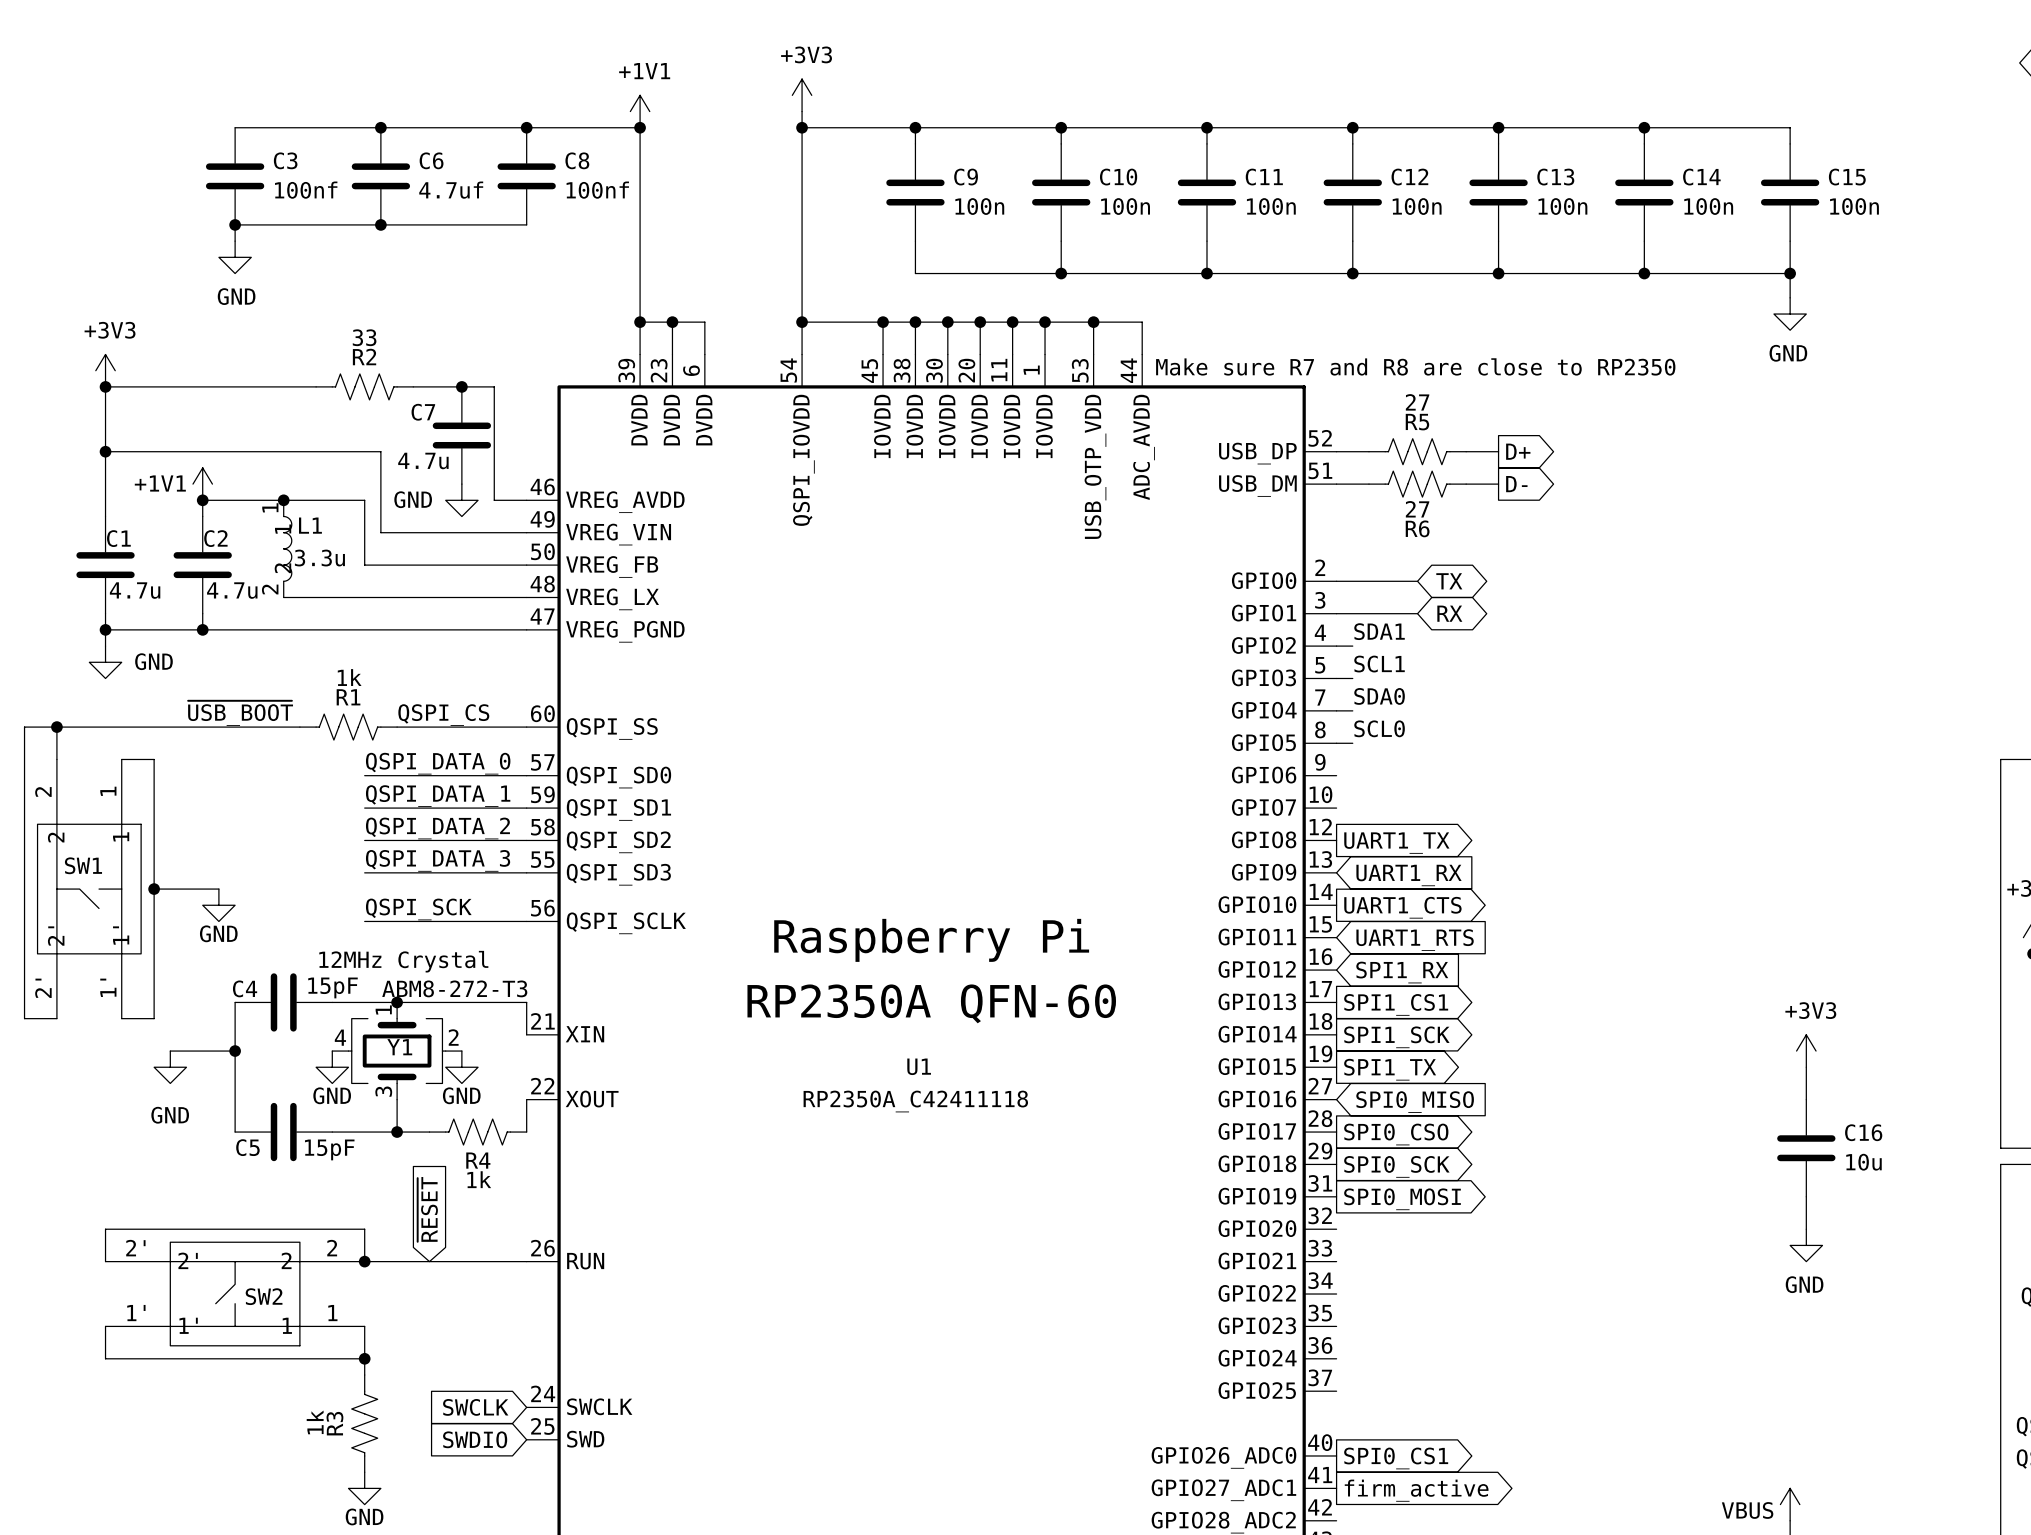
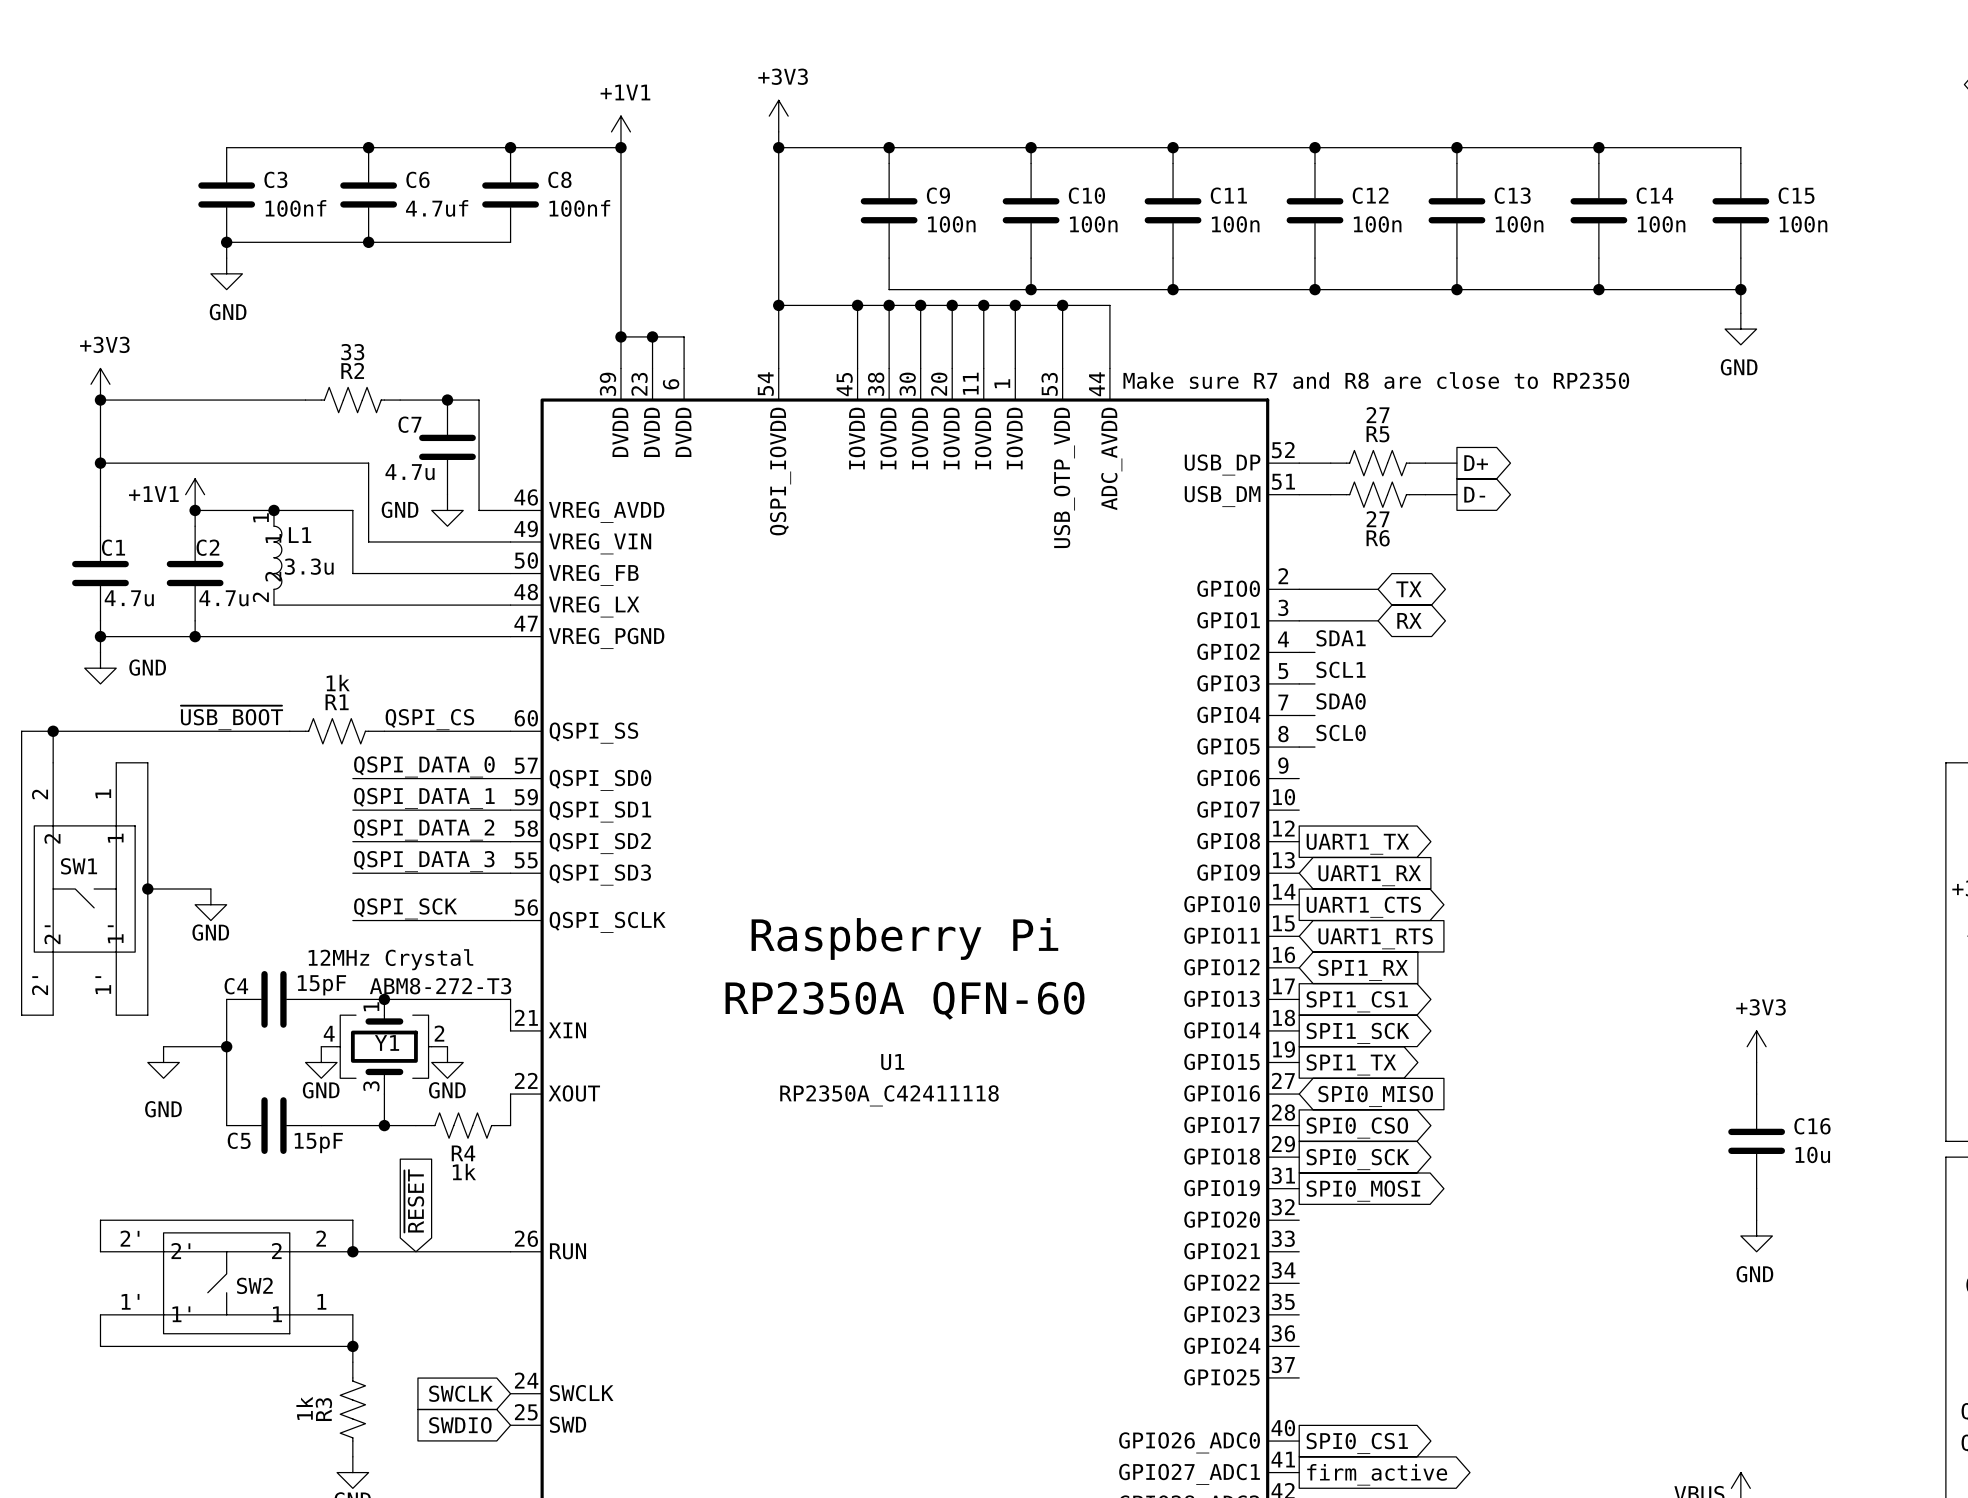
wire: none -> (857, 305) (857, 336)
junction: none -> (857, 305)
wire: none -> (889, 305) (889, 336)
junction: none -> (889, 305)
wire: none -> (920, 305) (920, 336)
junction: none -> (920, 305)
wire: none -> (952, 305) (952, 336)
junction: none -> (952, 305)
wire: none -> (983, 305) (983, 336)
junction: none -> (983, 305)
wire: none -> (1015, 305) (1015, 336)
junction: none -> (1015, 305)
wire: none -> (1062, 305) (1062, 336)
junction: none -> (1062, 305)
wire: (802, 322) (1142, 322) -> (778, 305) (1109, 305) (1109, 336)
junction position: (802, 322) -> (778, 305)
junction: (883, 322) -> none
junction: (915, 322) -> none
junction: (947, 322) -> none
junction: (980, 322) -> none
junction: (1012, 322) -> none
junction: (1045, 322) -> none
junction: (1093, 322) -> none

